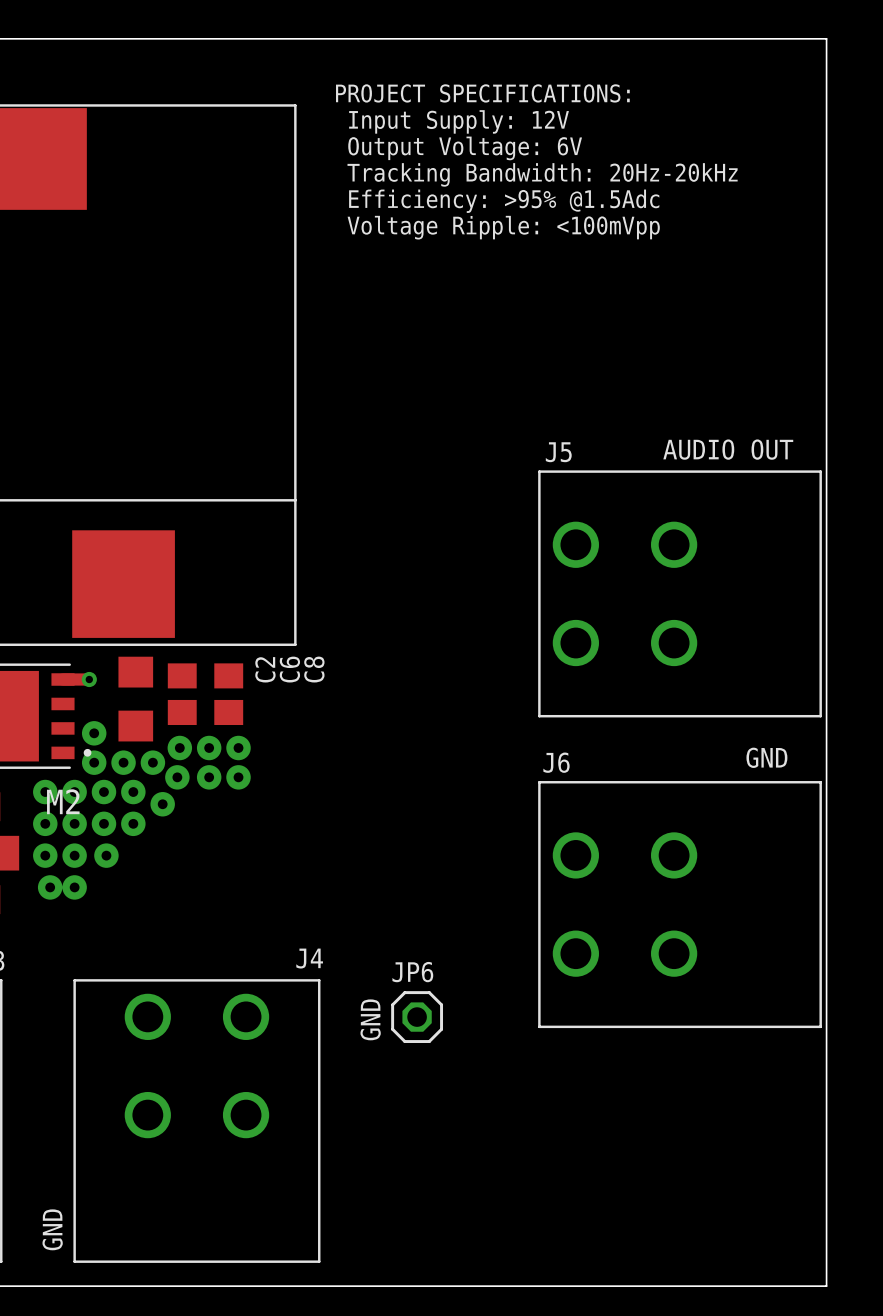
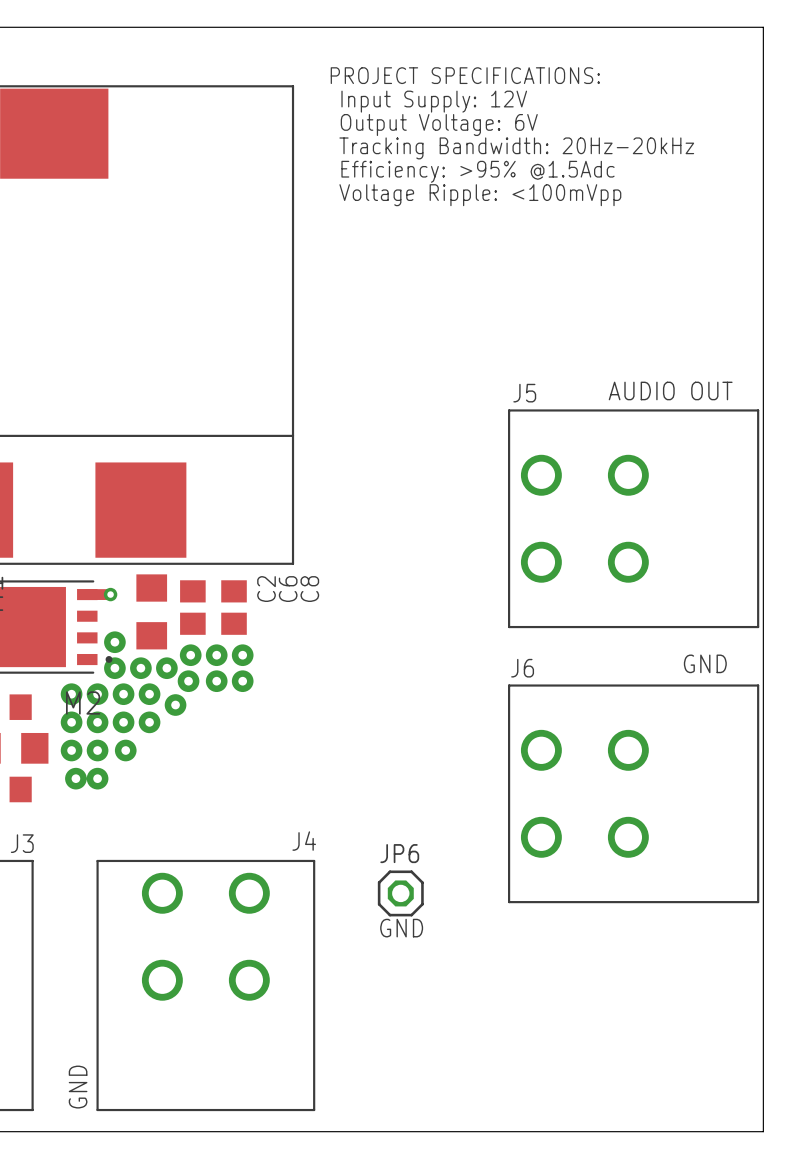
text rotation: 0° (370, 1019) -> 90° clockwise (401, 928)
text position: GND (370, 1019) -> GND (401, 928)

